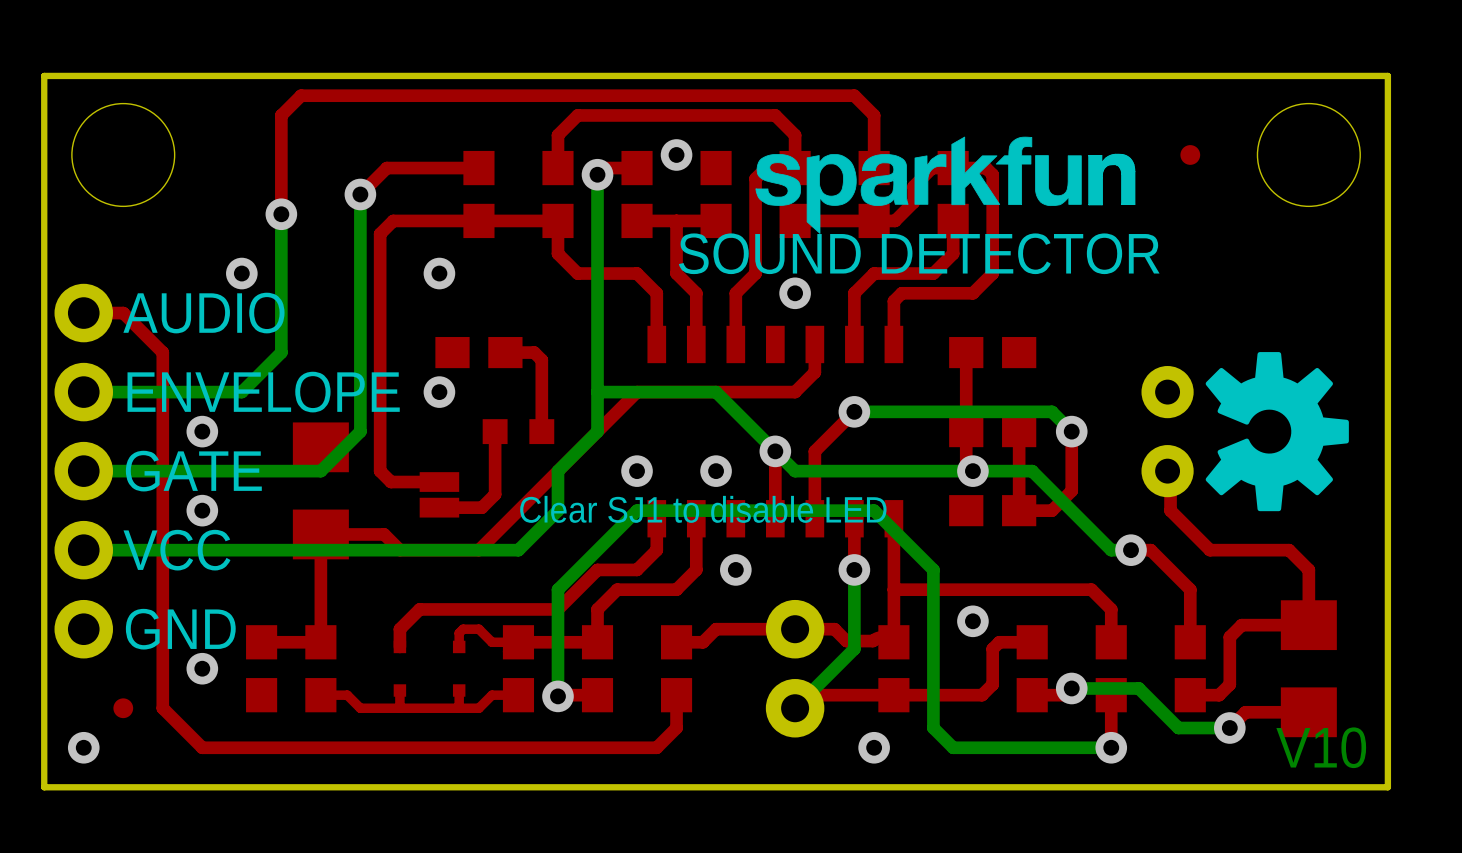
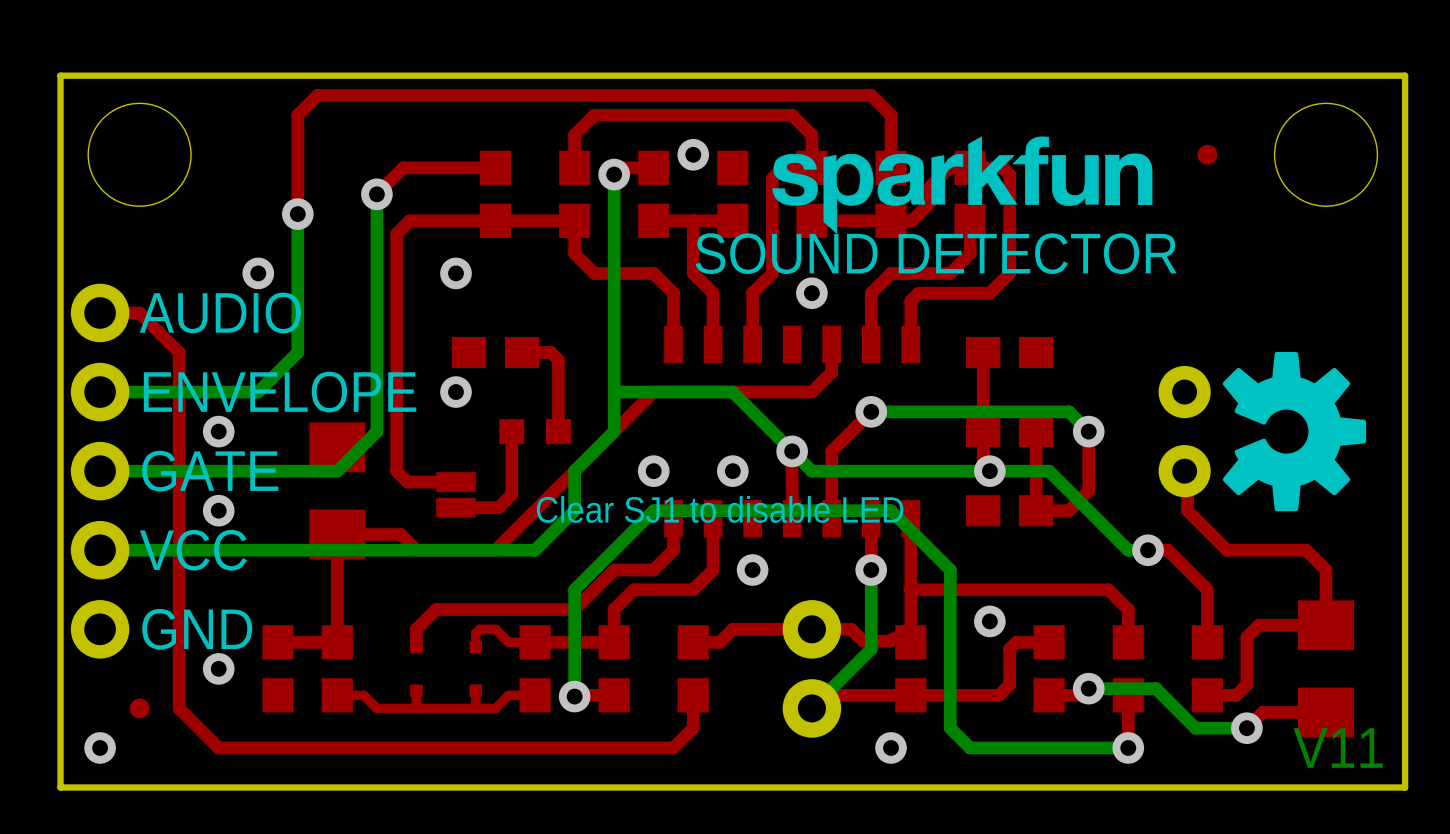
text: V10 (1321, 747) -> V11 (1338, 747)

